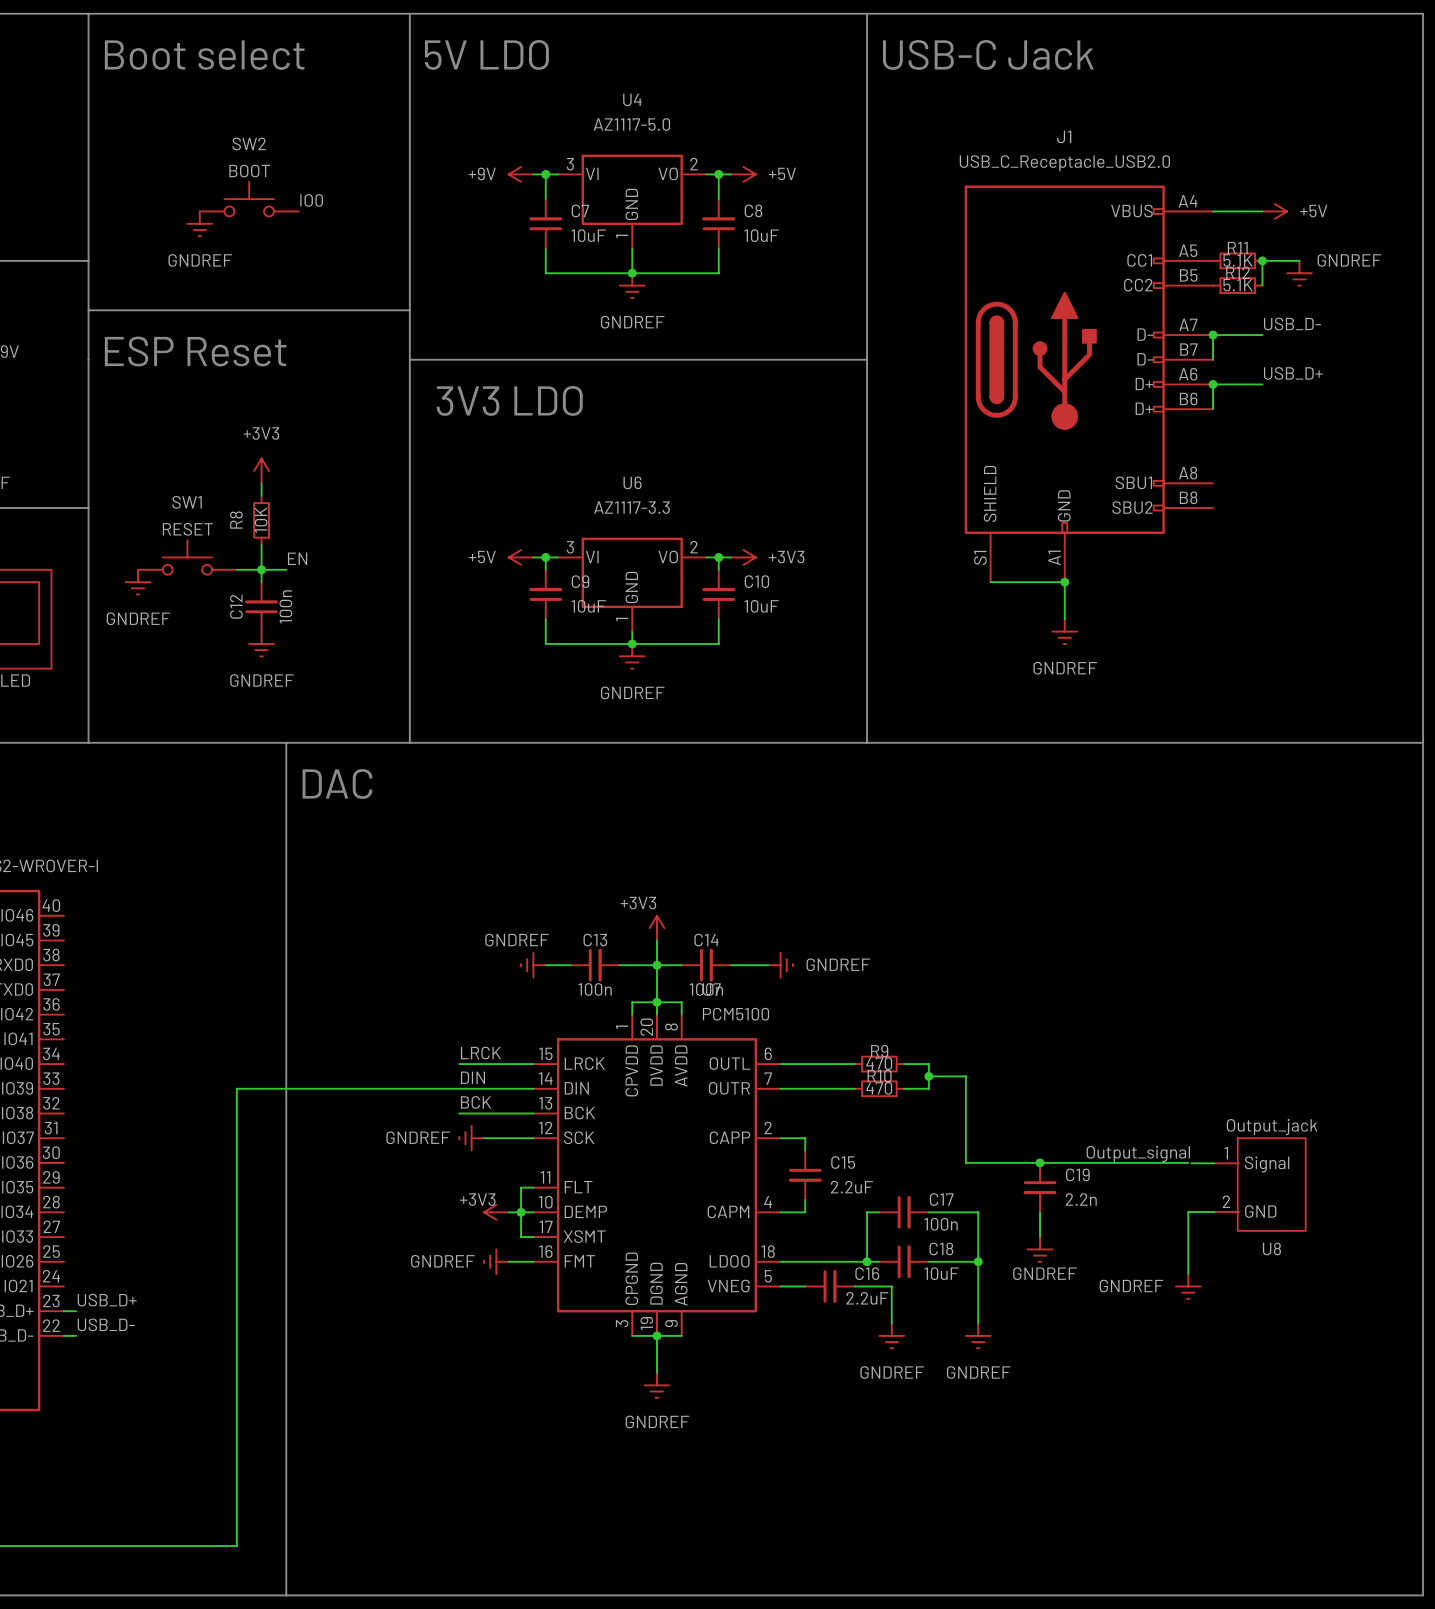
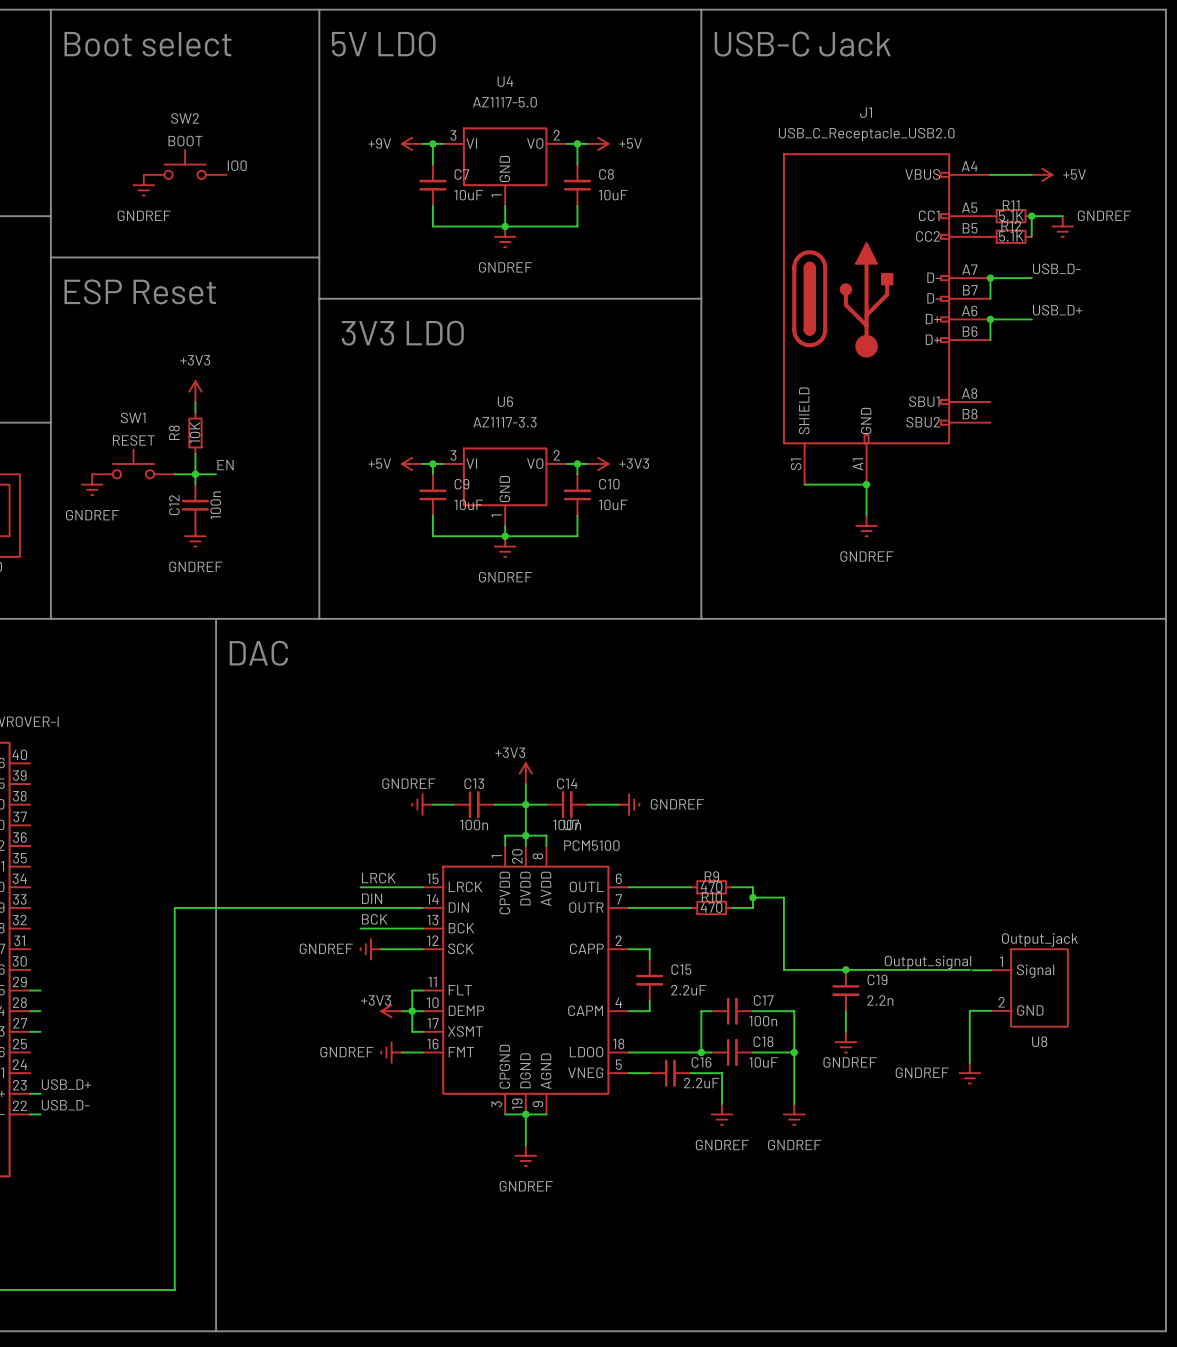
wire: none -> (30, 990) (40, 990)
wire: none -> (30, 1011) (40, 1011)
wire: none -> (30, 1031) (40, 1031)

